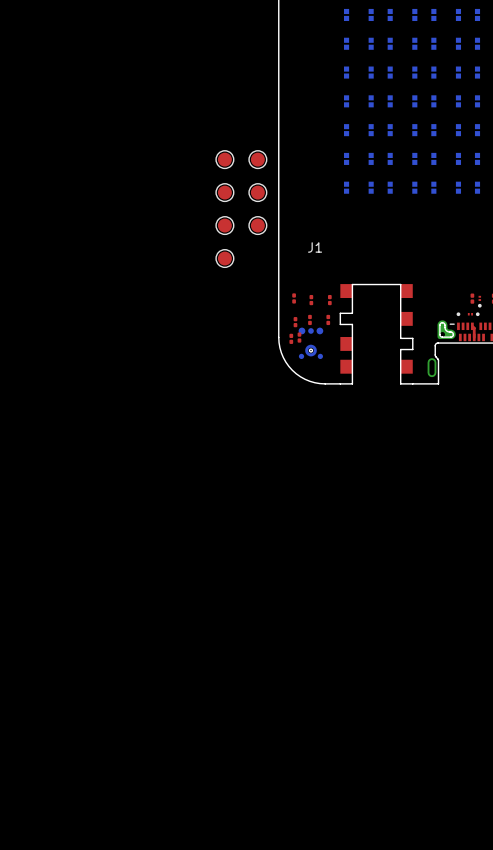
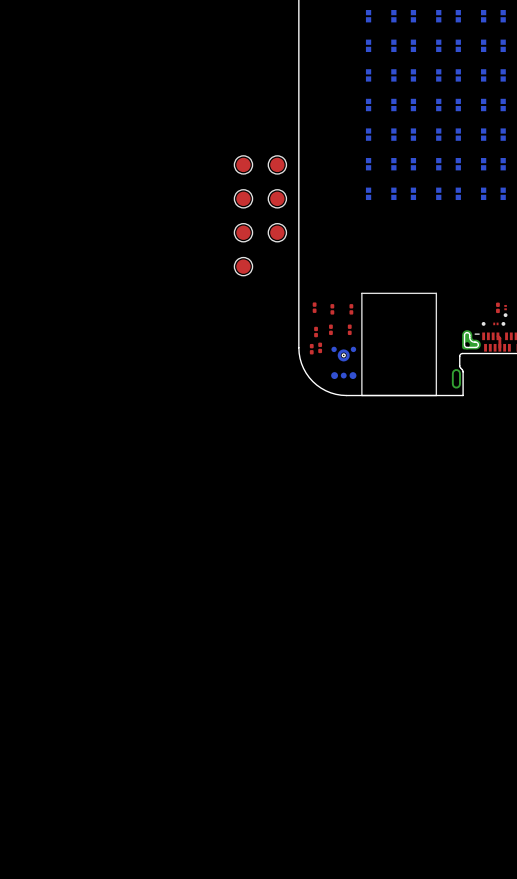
line: none -> (361, 293) (436, 293) (436, 395) (361, 395) (361, 293)
J1: (376, 334) -> none
part rotation: 0° (310, 343) -> 180° (343, 362)

